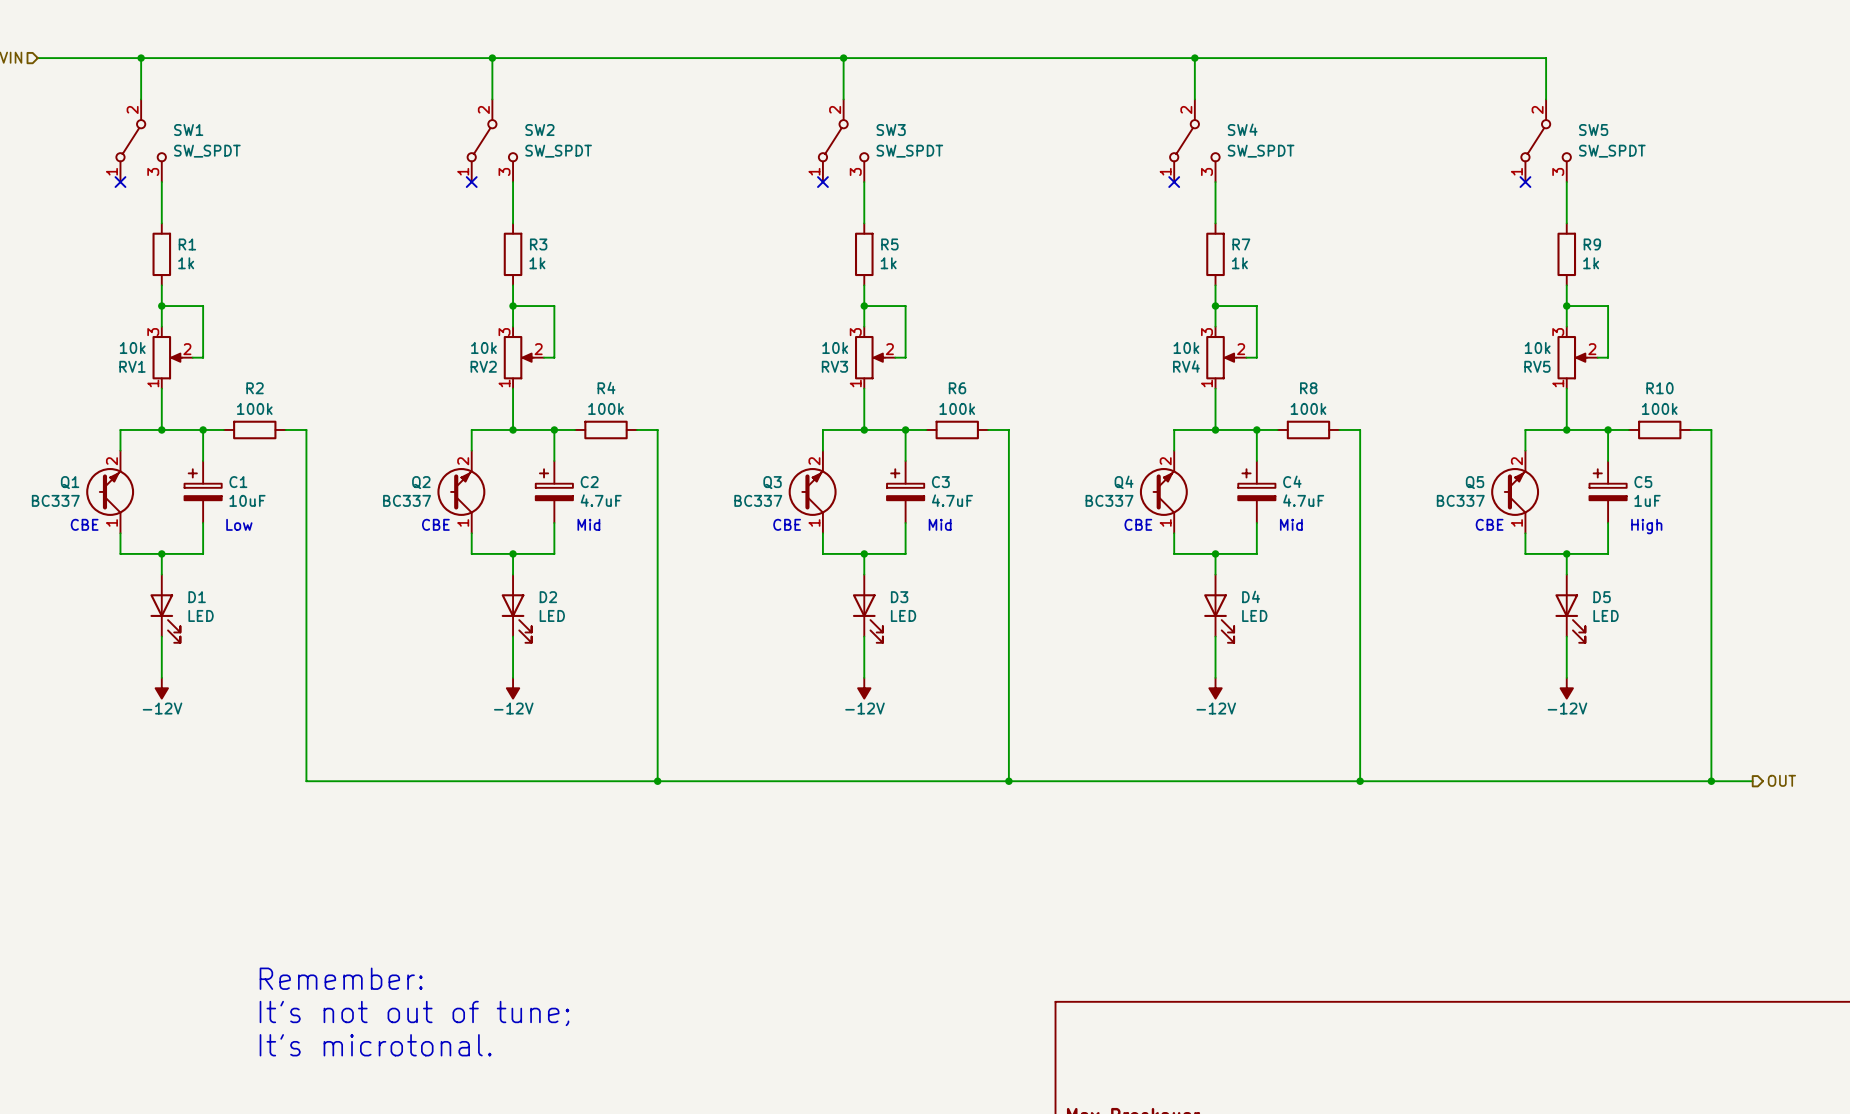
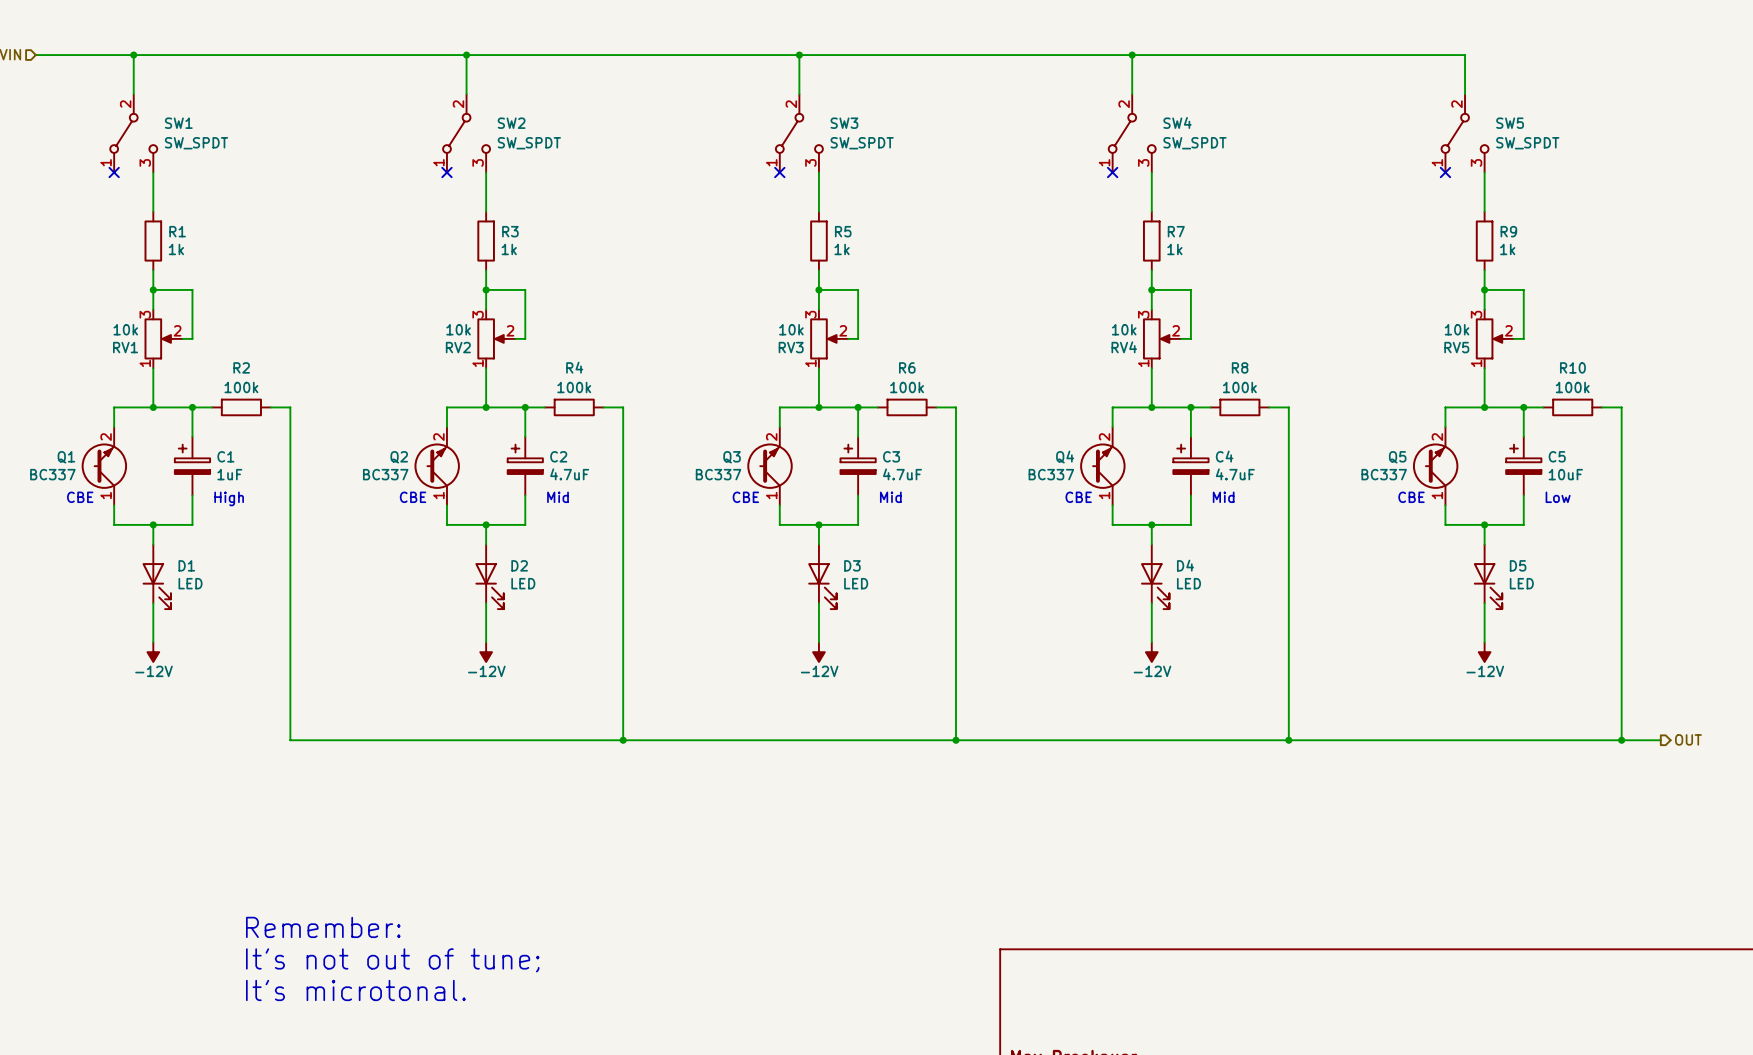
C1 value: 10uF (247, 500) -> 1uF (229, 474)
C5 value: 1uF (1647, 500) -> 10uF (1565, 474)
text: Low (239, 524) -> High (229, 498)
text: High (1646, 526) -> Low (1558, 497)

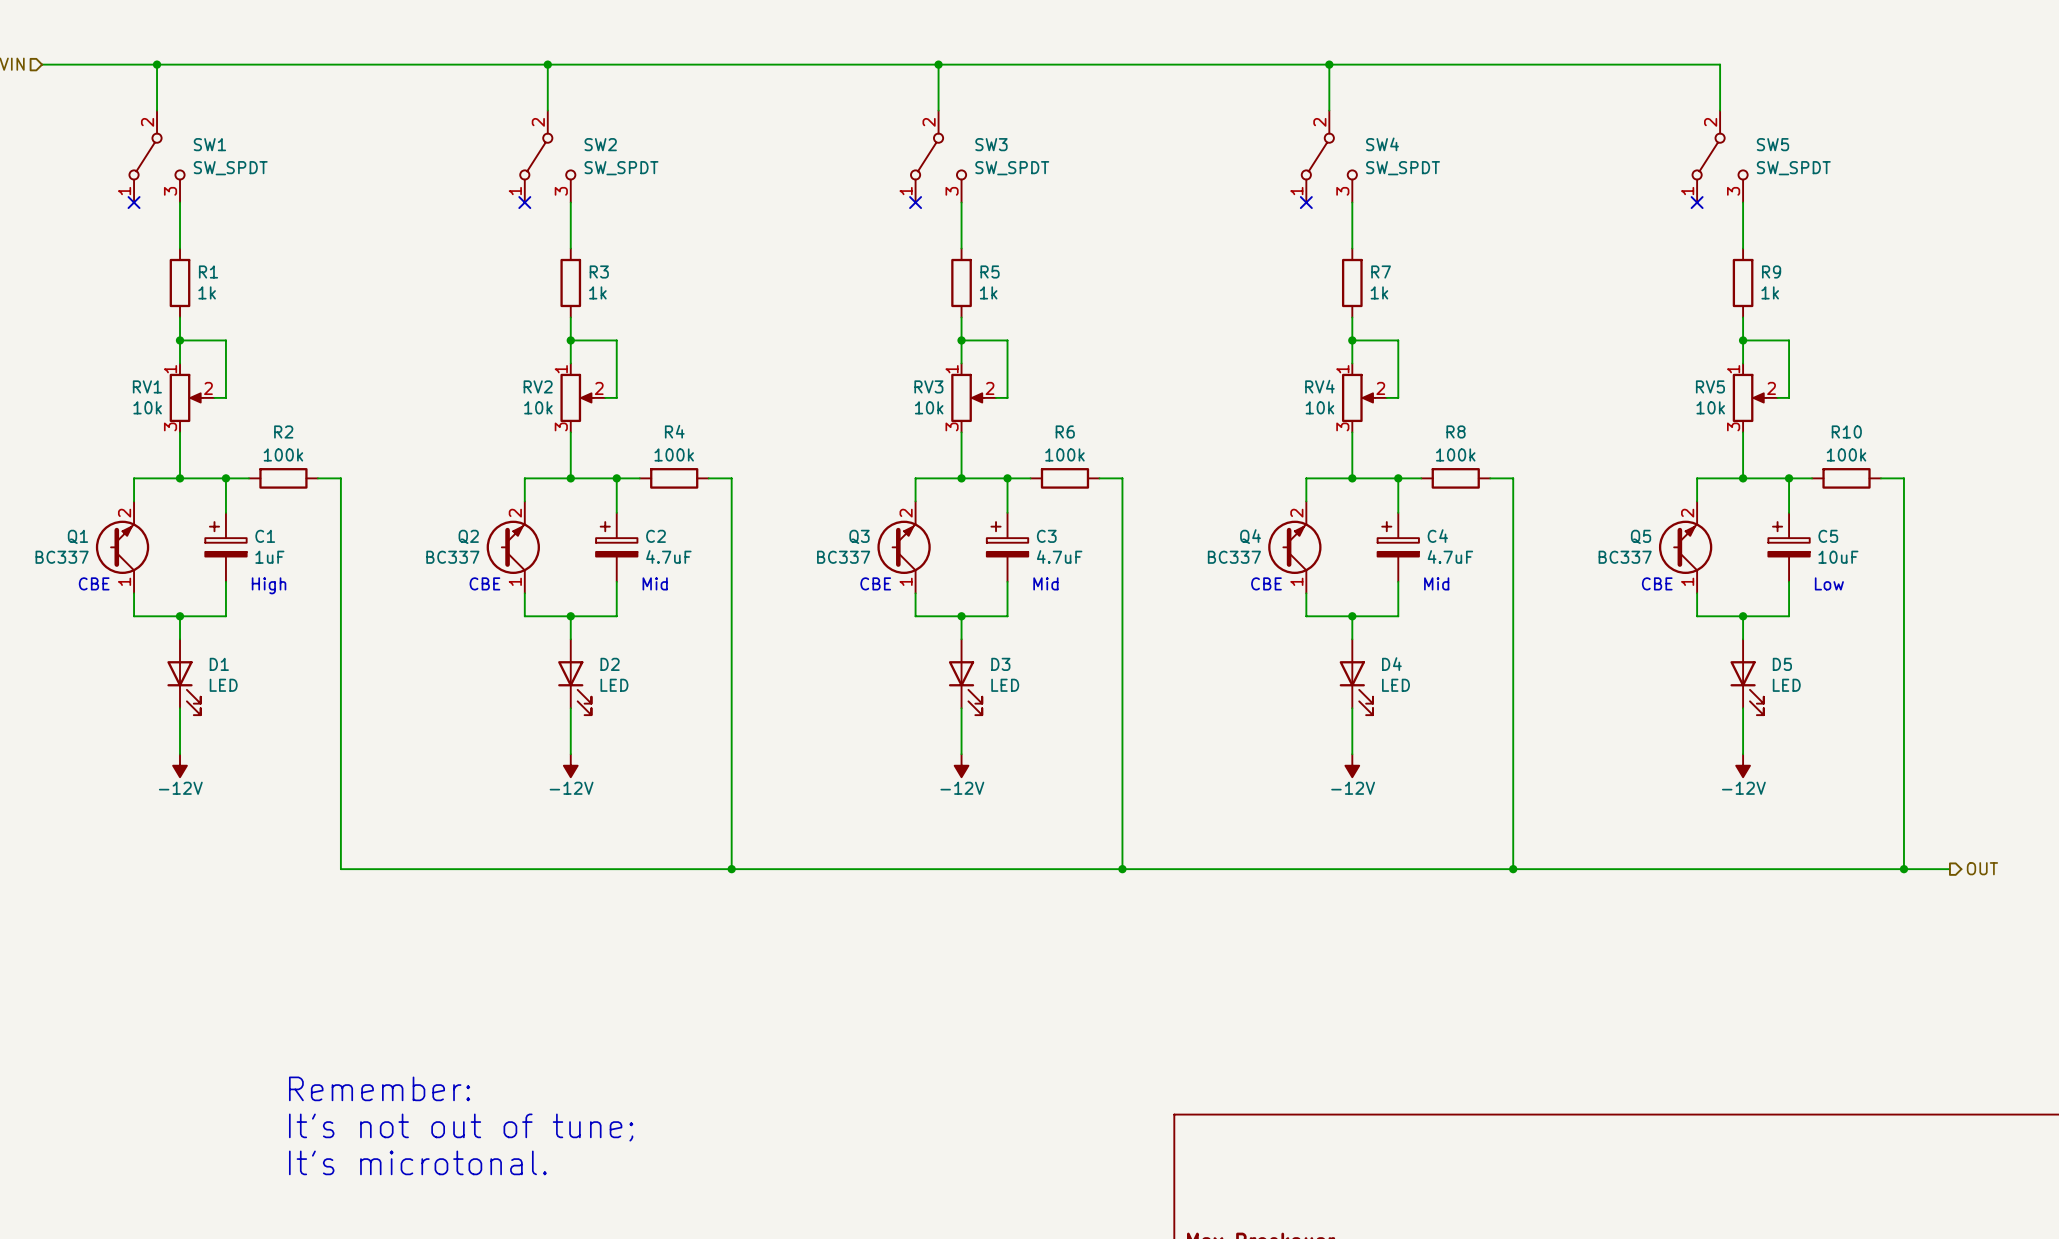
RV1 flip: as is (158, 338) -> up-down (186, 397)
RV2 flip: as is (491, 338) -> up-down (577, 397)
RV3 flip: as is (824, 338) -> up-down (967, 397)
RV4 flip: as is (1157, 338) -> up-down (1358, 397)
RV5 flip: as is (1489, 338) -> up-down (1749, 397)

